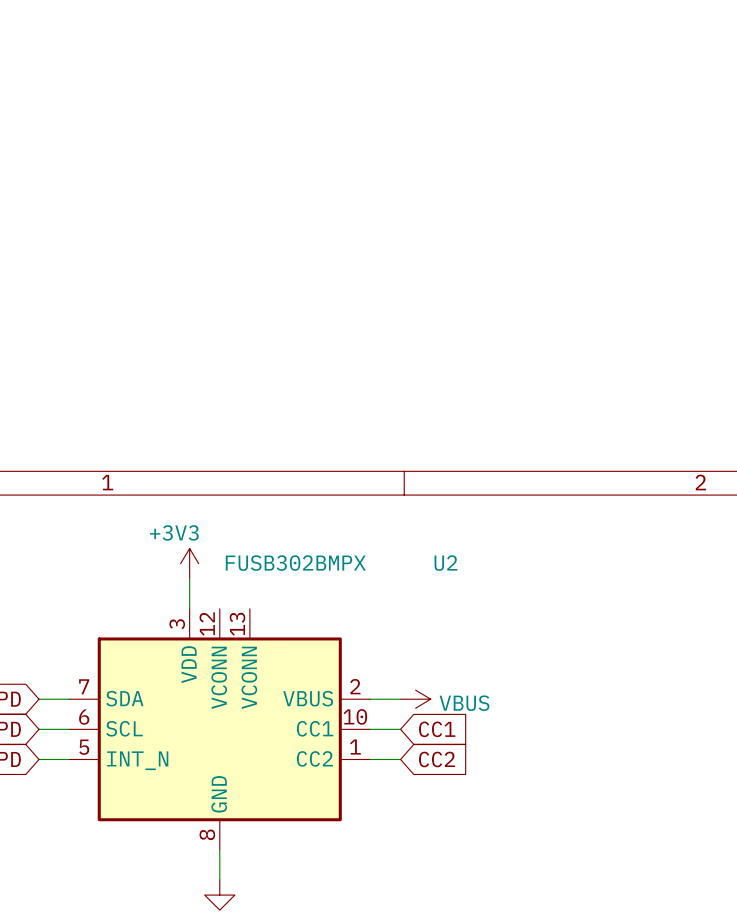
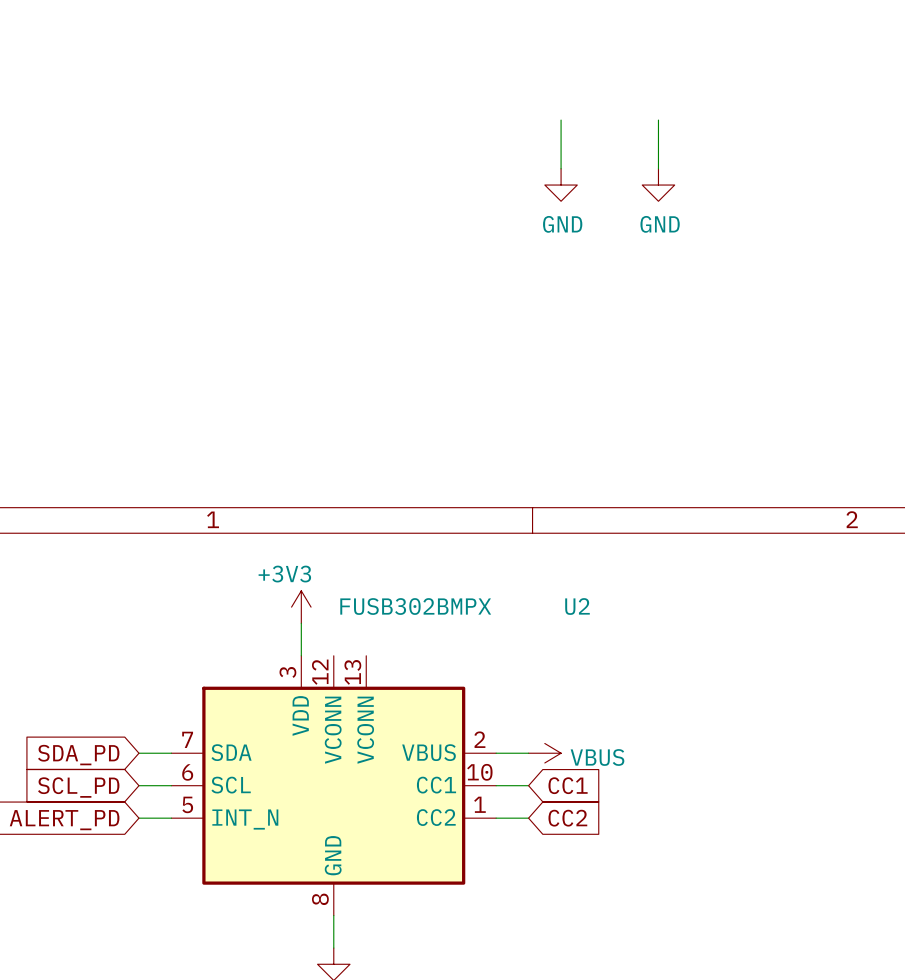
wire: none -> (561, 120) (561, 168)
wire: none -> (658, 120) (658, 168)
power symbol: none -> GND (561, 185)
power symbol: none -> GND (658, 185)

